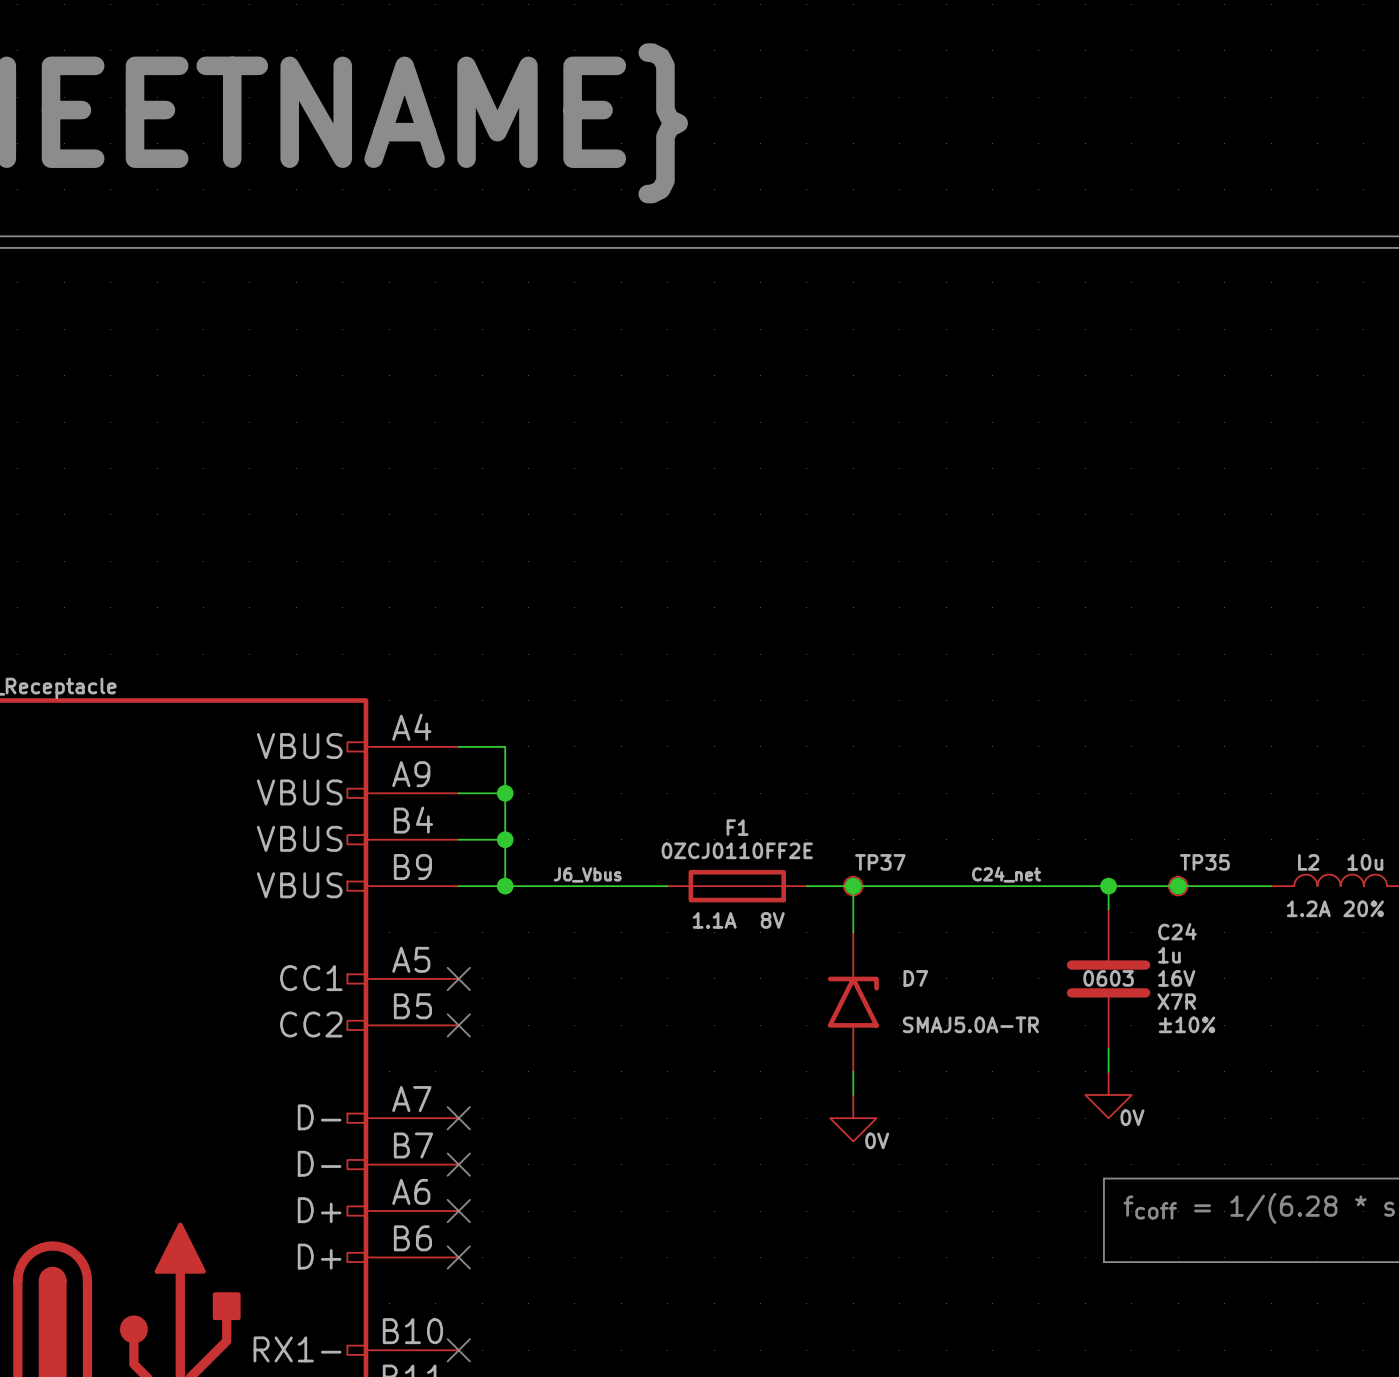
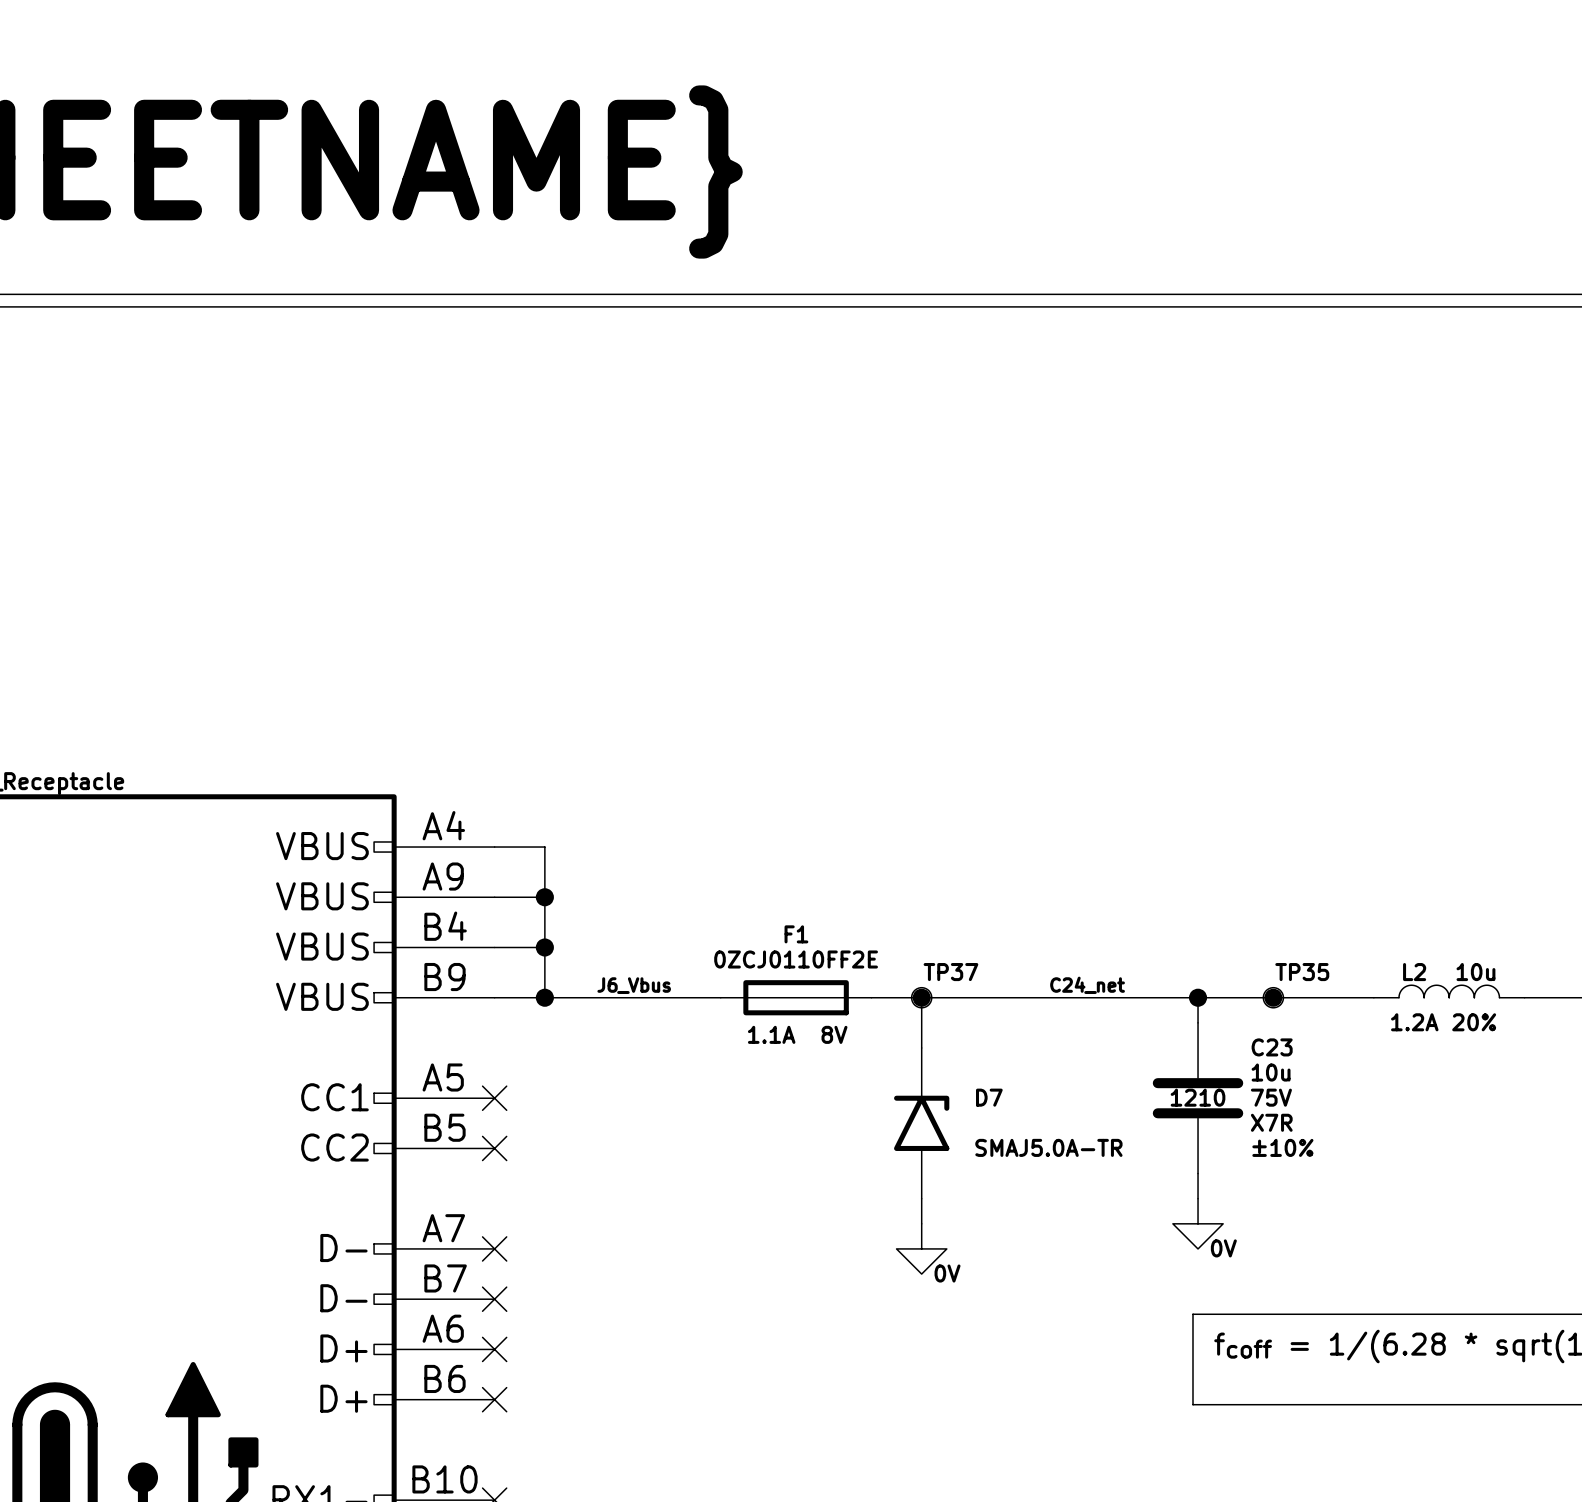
C24 name: C24 (1177, 931) -> C23 (1272, 1047)
C24 value: 1u (1169, 955) -> 10u (1271, 1072)
C24 text: 0603 (1108, 978) -> 1210 (1198, 1097)
C24 text: 16V (1176, 978) -> 75V (1271, 1097)

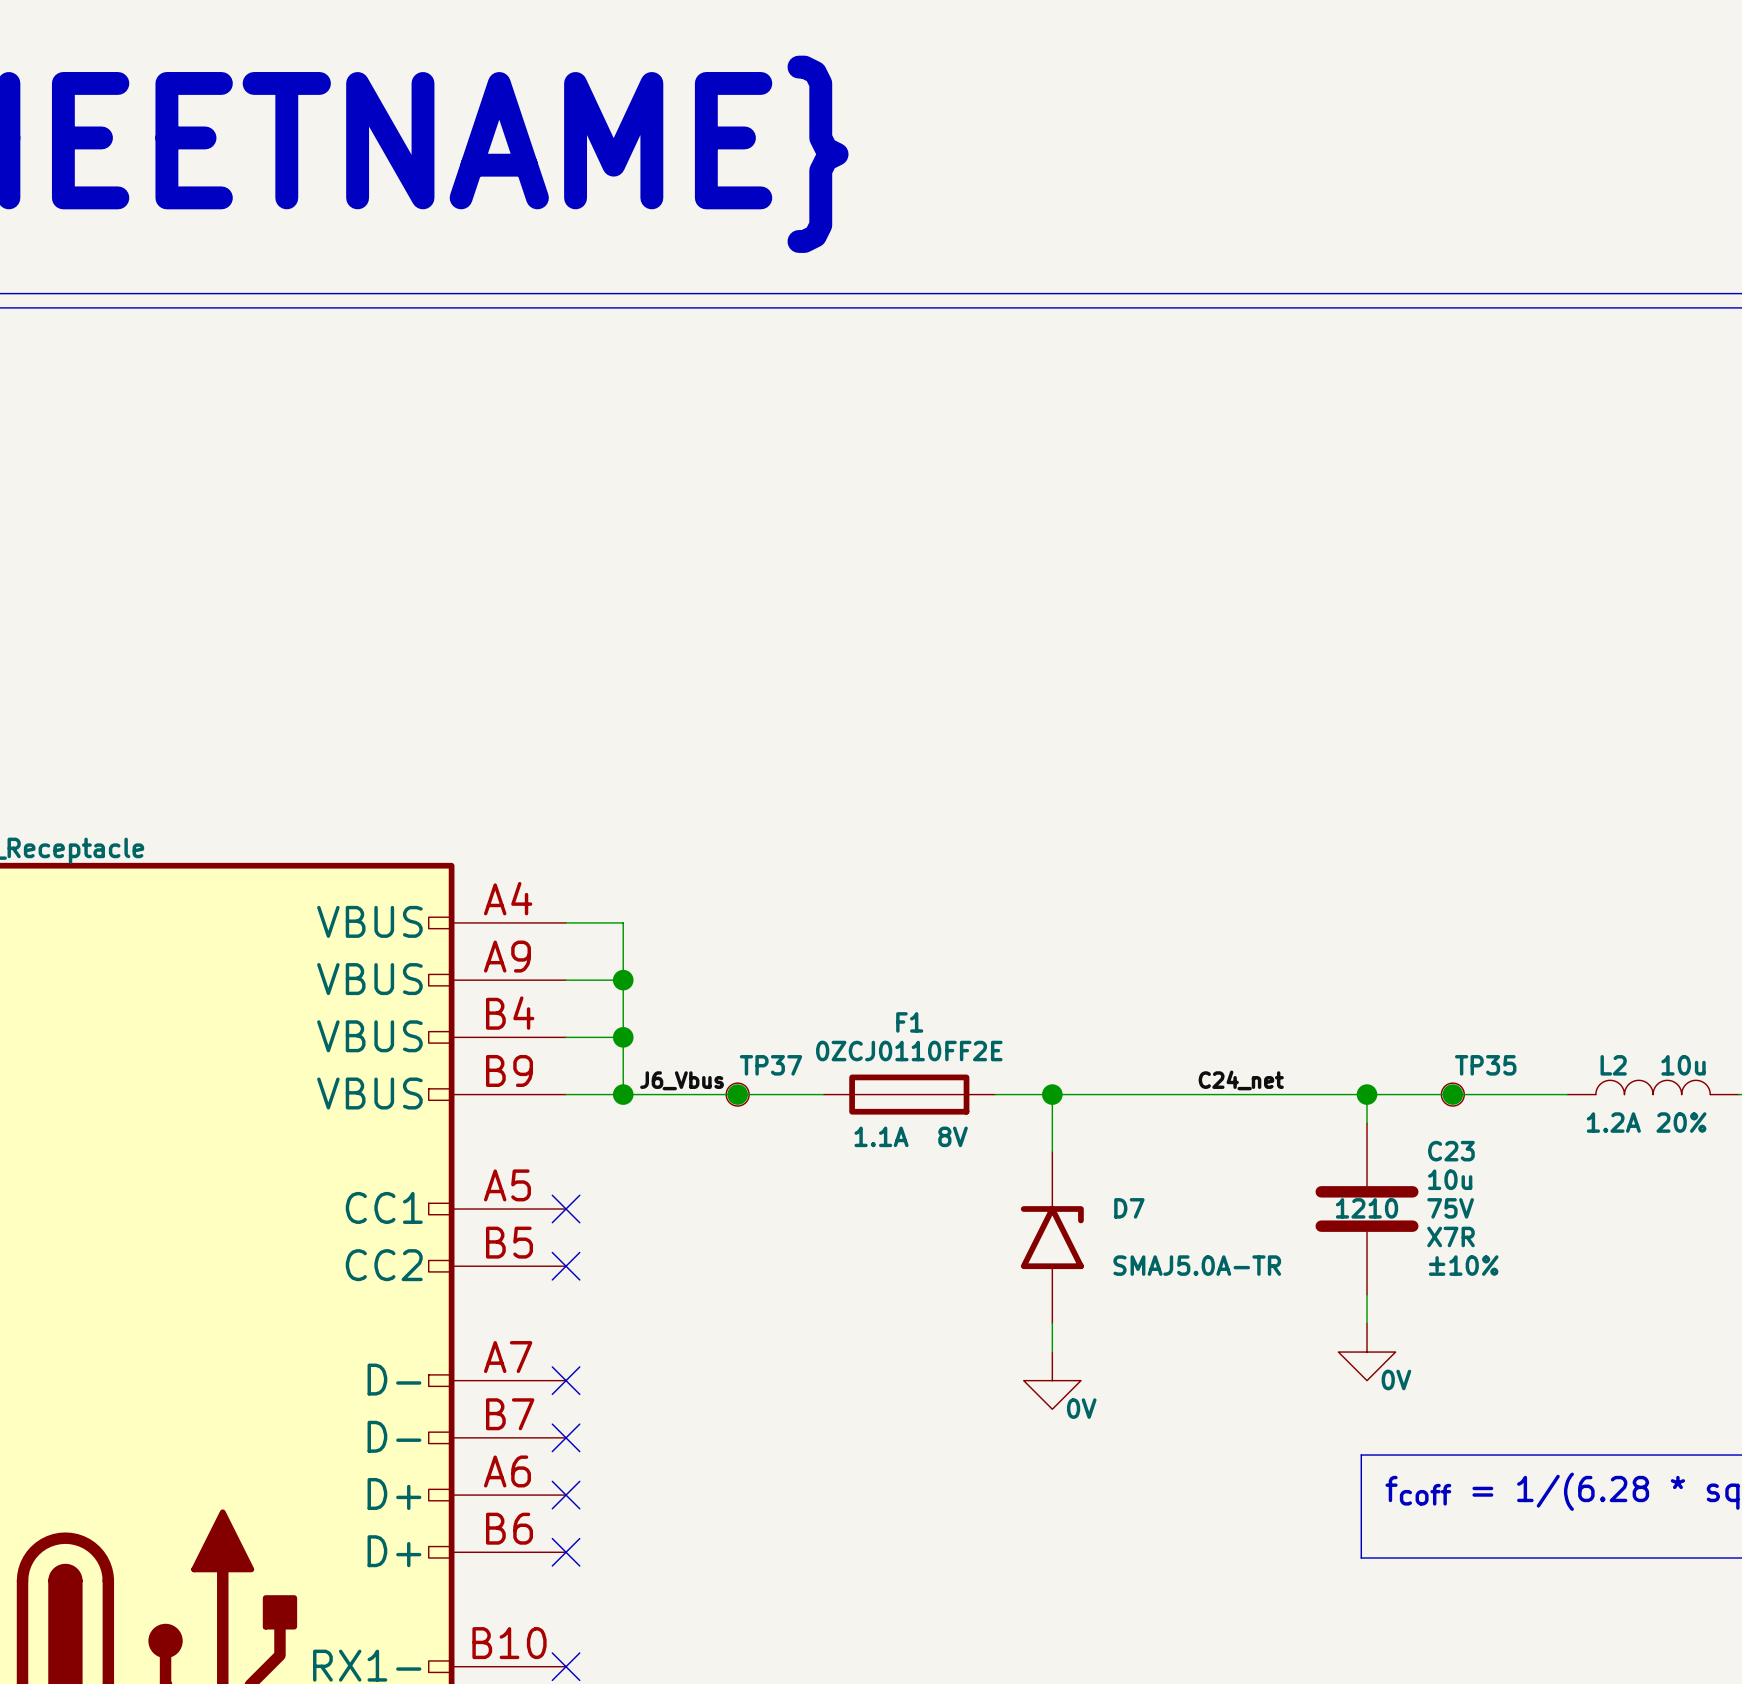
label position: J6_Vbus (634, 985) -> J6_Vbus (682, 1080)
junction: none -> (737, 1094)
TP37 position: (921, 997) -> (737, 1094)

